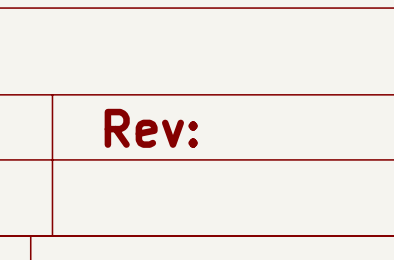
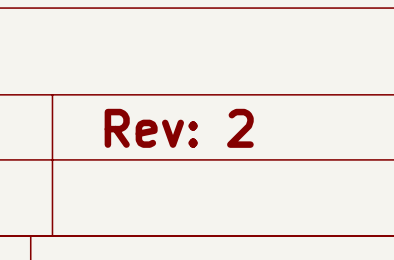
title block: Rev: (151, 128) -> Rev: 2 (179, 128)

